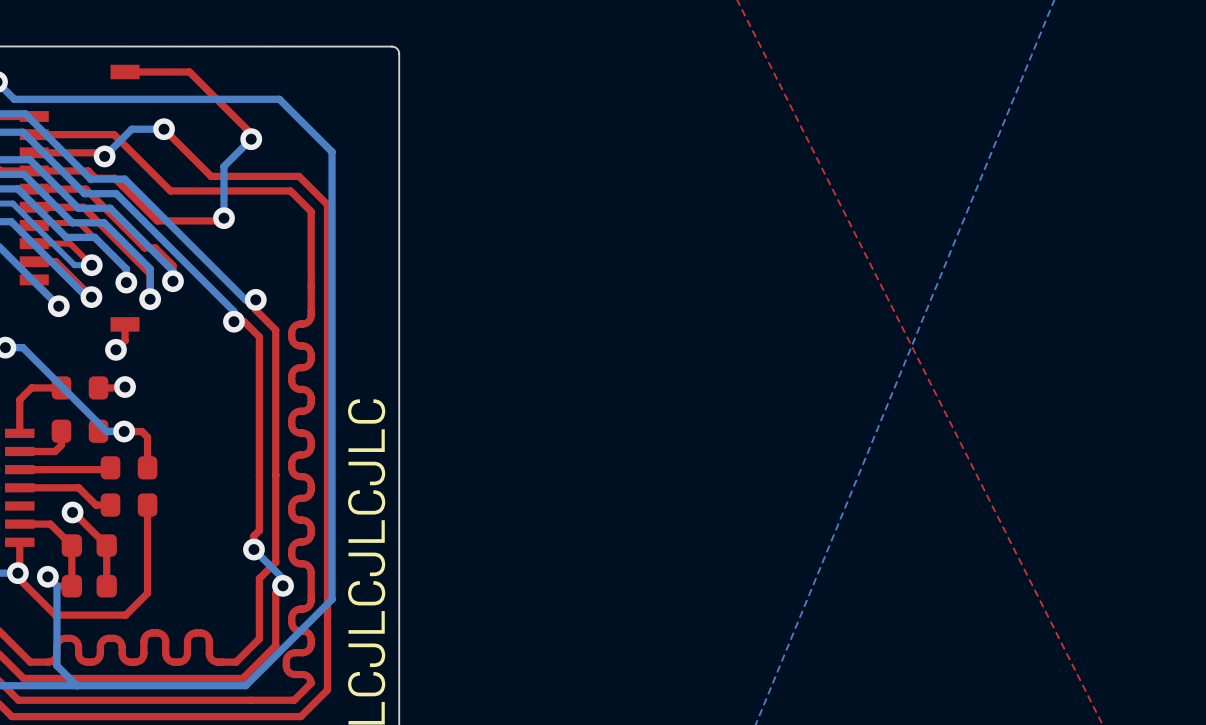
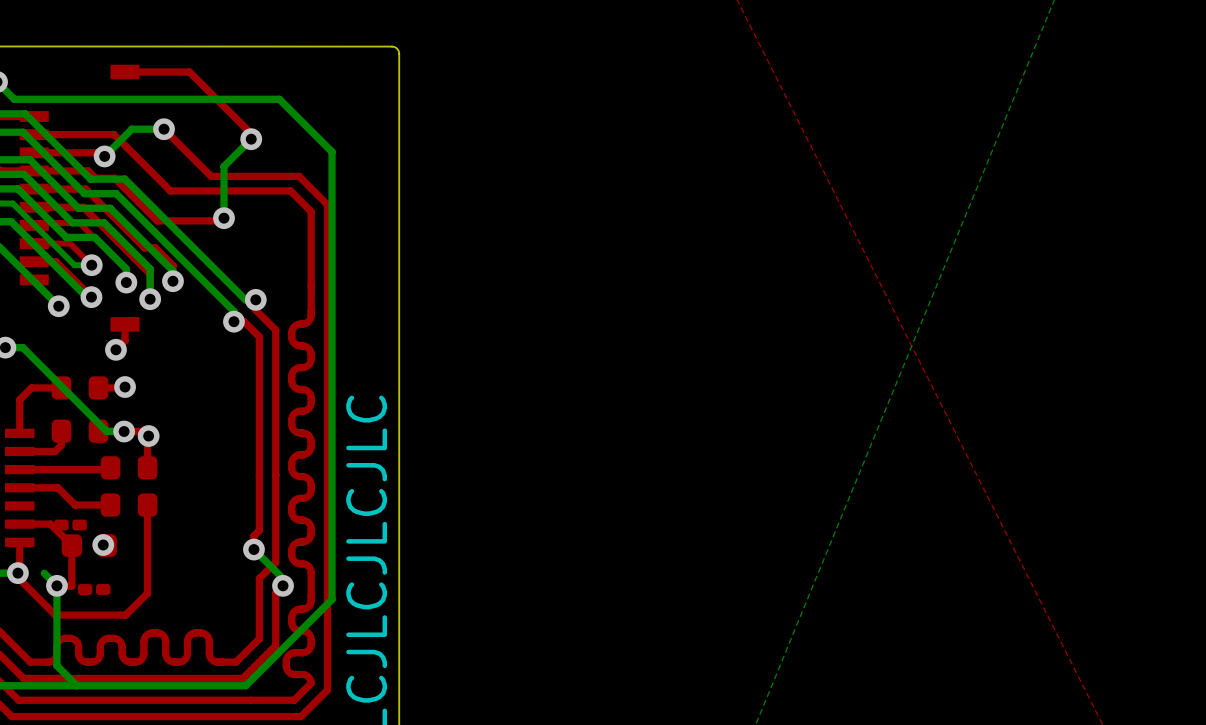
via: none -> (148, 436)
top track: (57, 487) (78, 487) (95, 505) -> (57, 487) (75, 505) (95, 505)
top track: (72, 512) (106, 545) (106, 586) -> none
via: (72, 512) -> none
part: none -> (70, 525)
via: none -> (103, 545)
part footprint: [61, 574, 117, 598] -> [77, 584, 111, 595]
via position: (47, 576) -> (56, 585)

